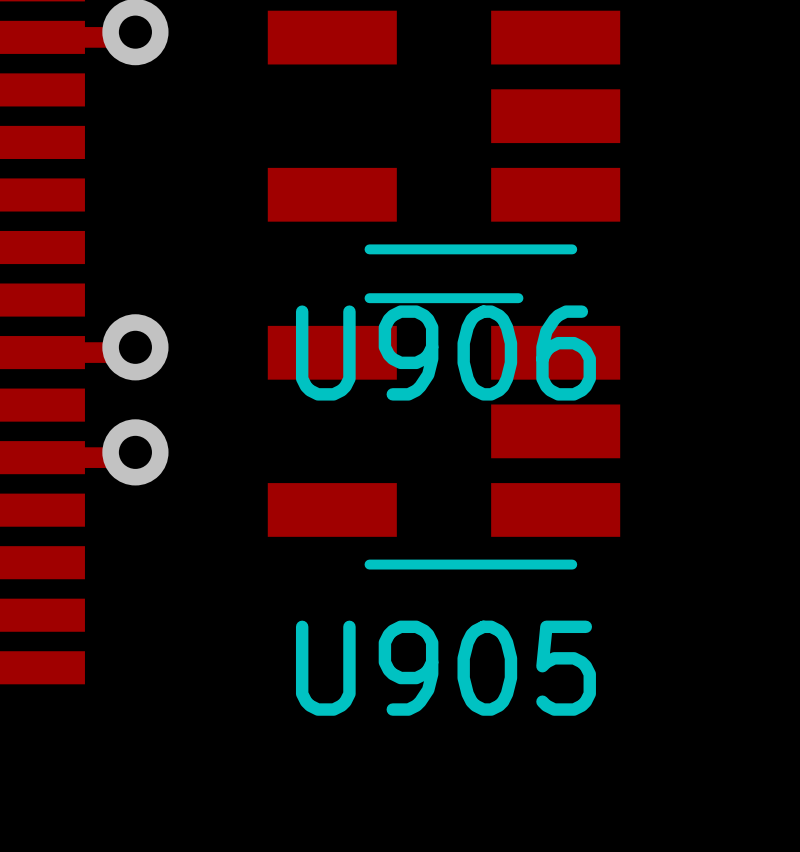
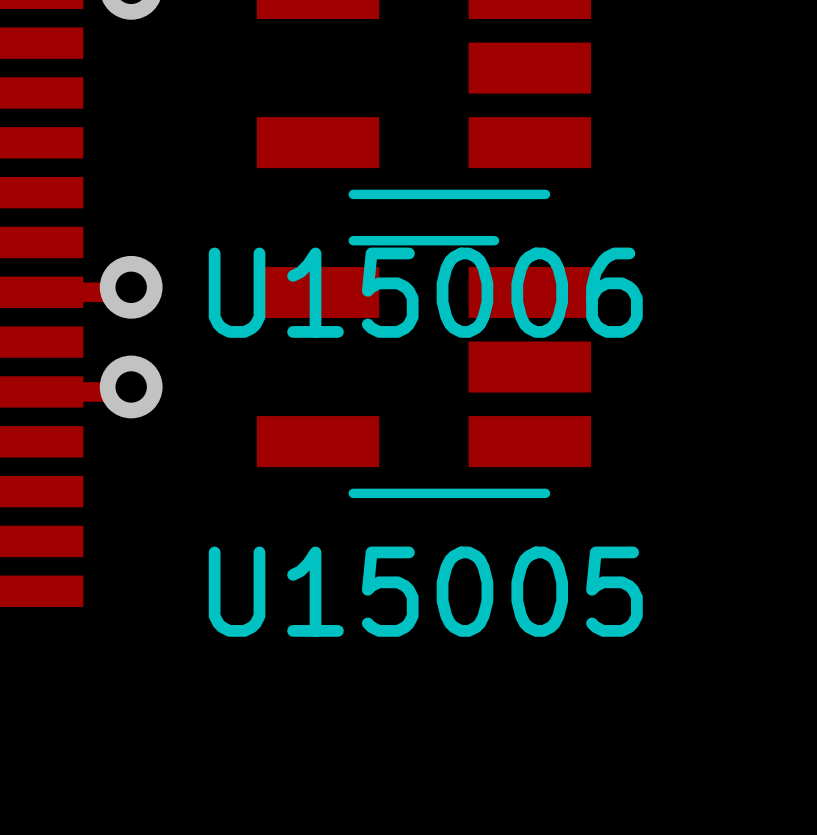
U906 name: U906 (445, 353) -> U15006 (425, 292)
U905 name: U905 (445, 668) -> U15005 (425, 591)

